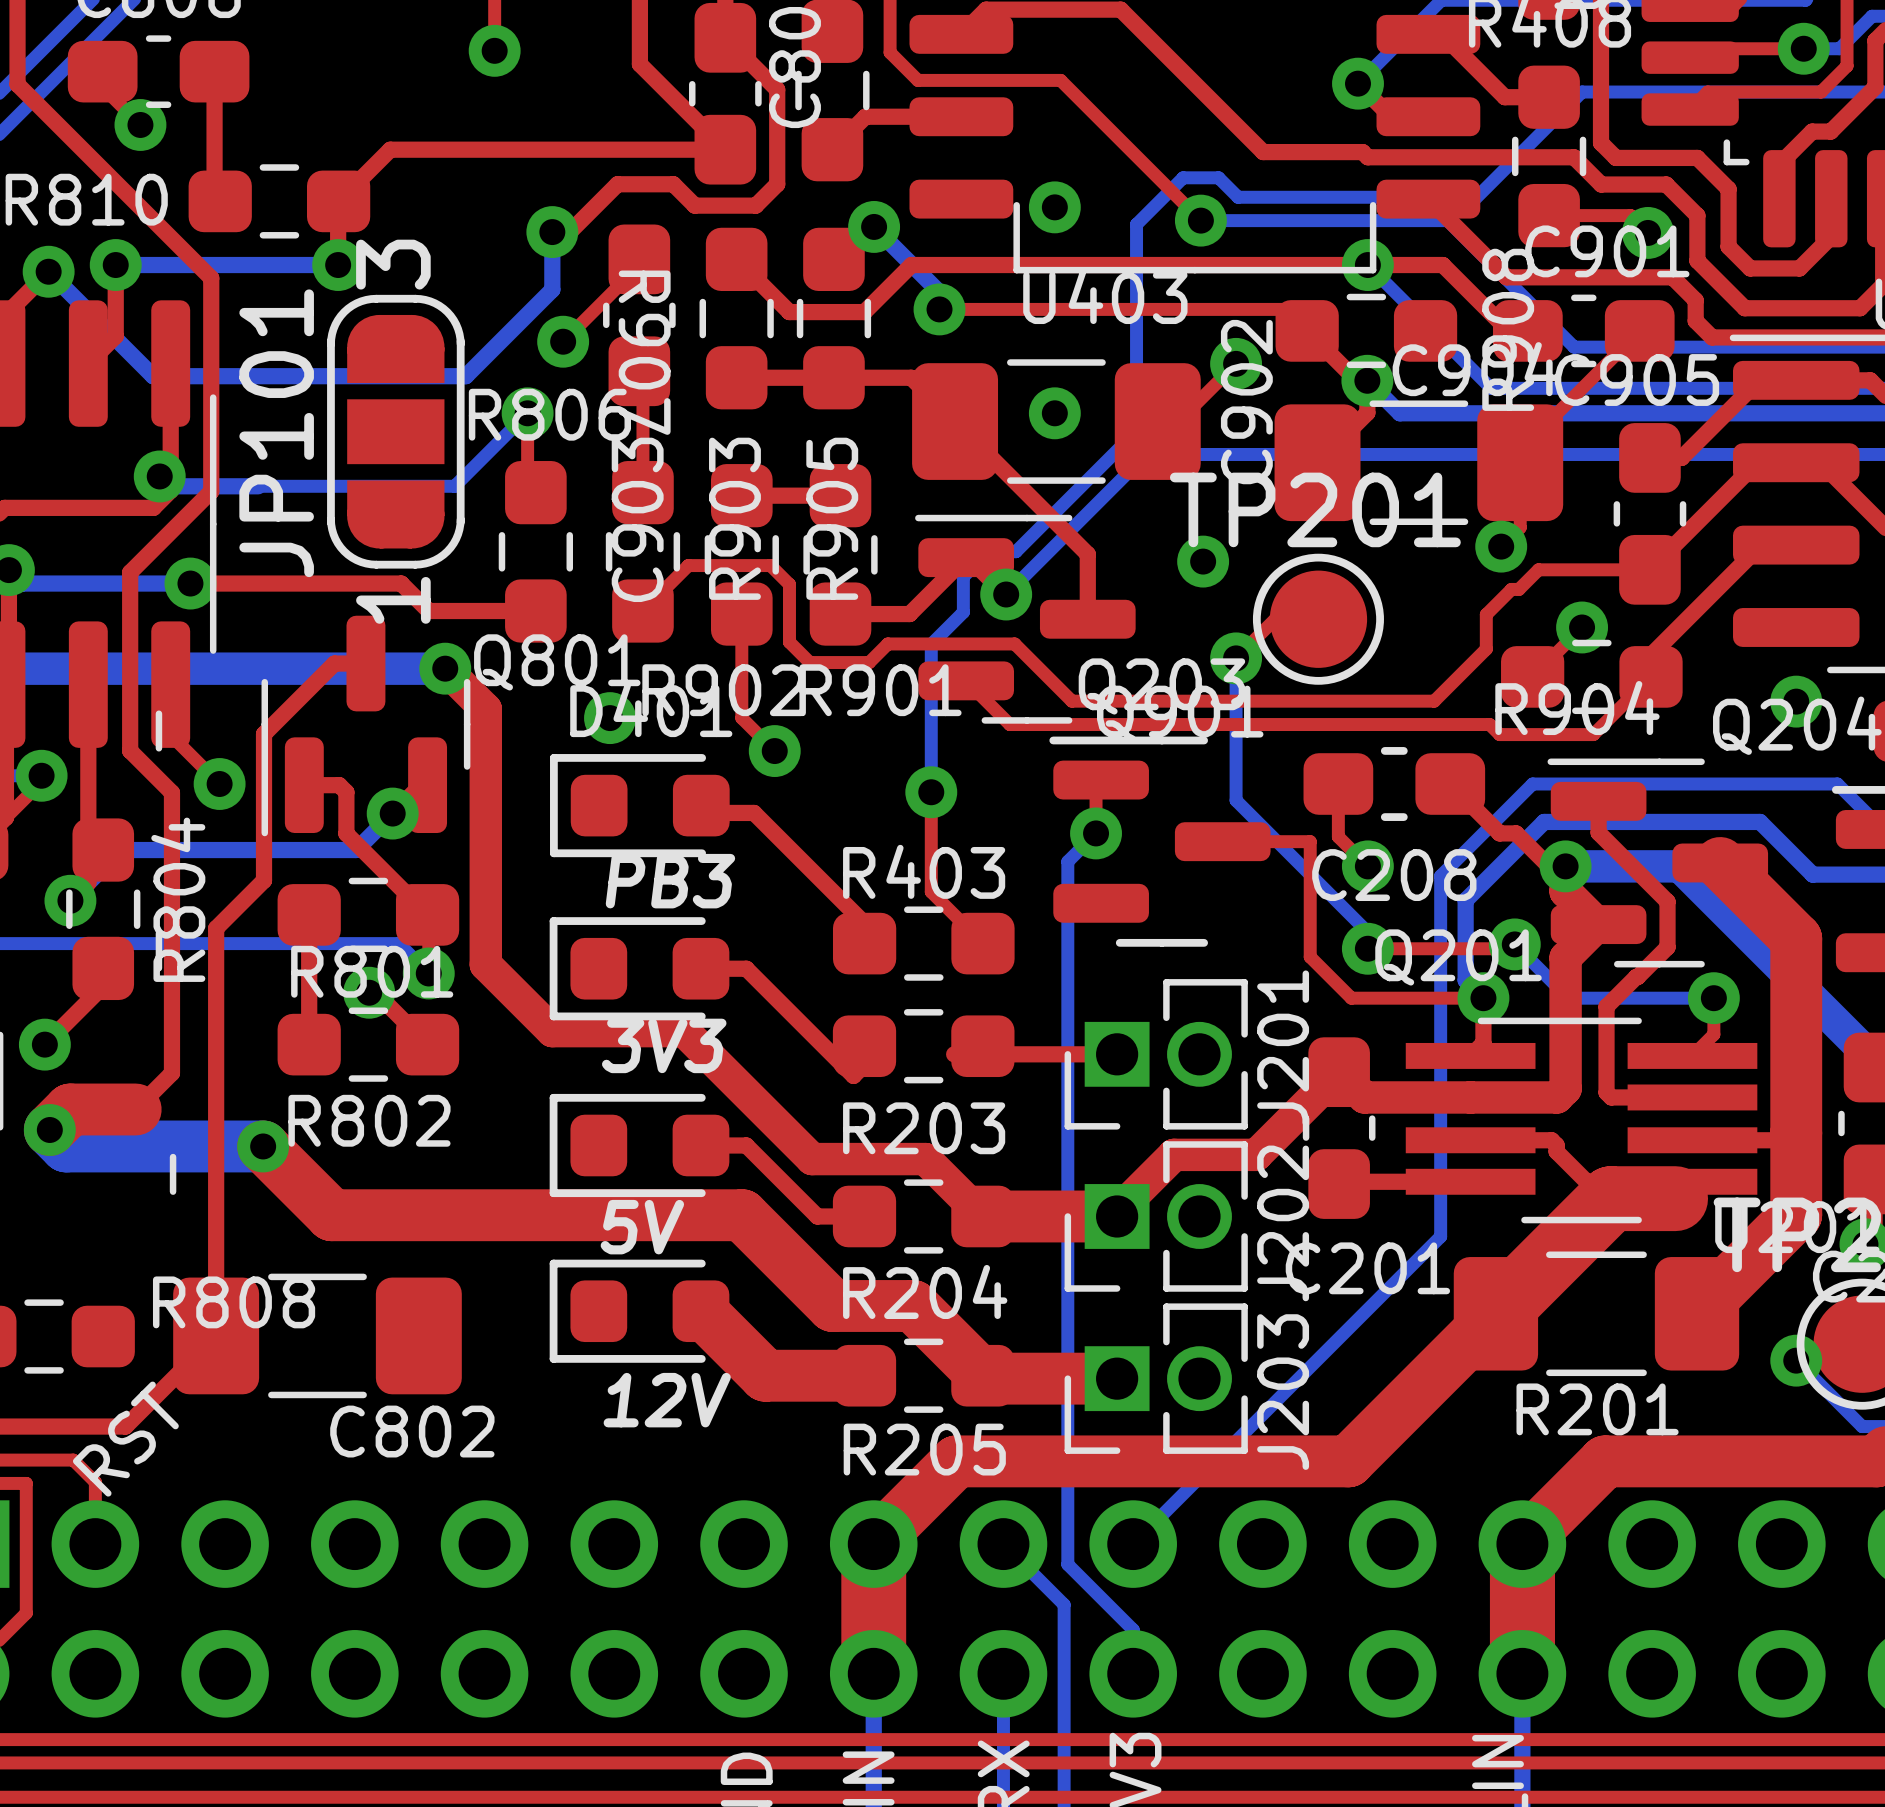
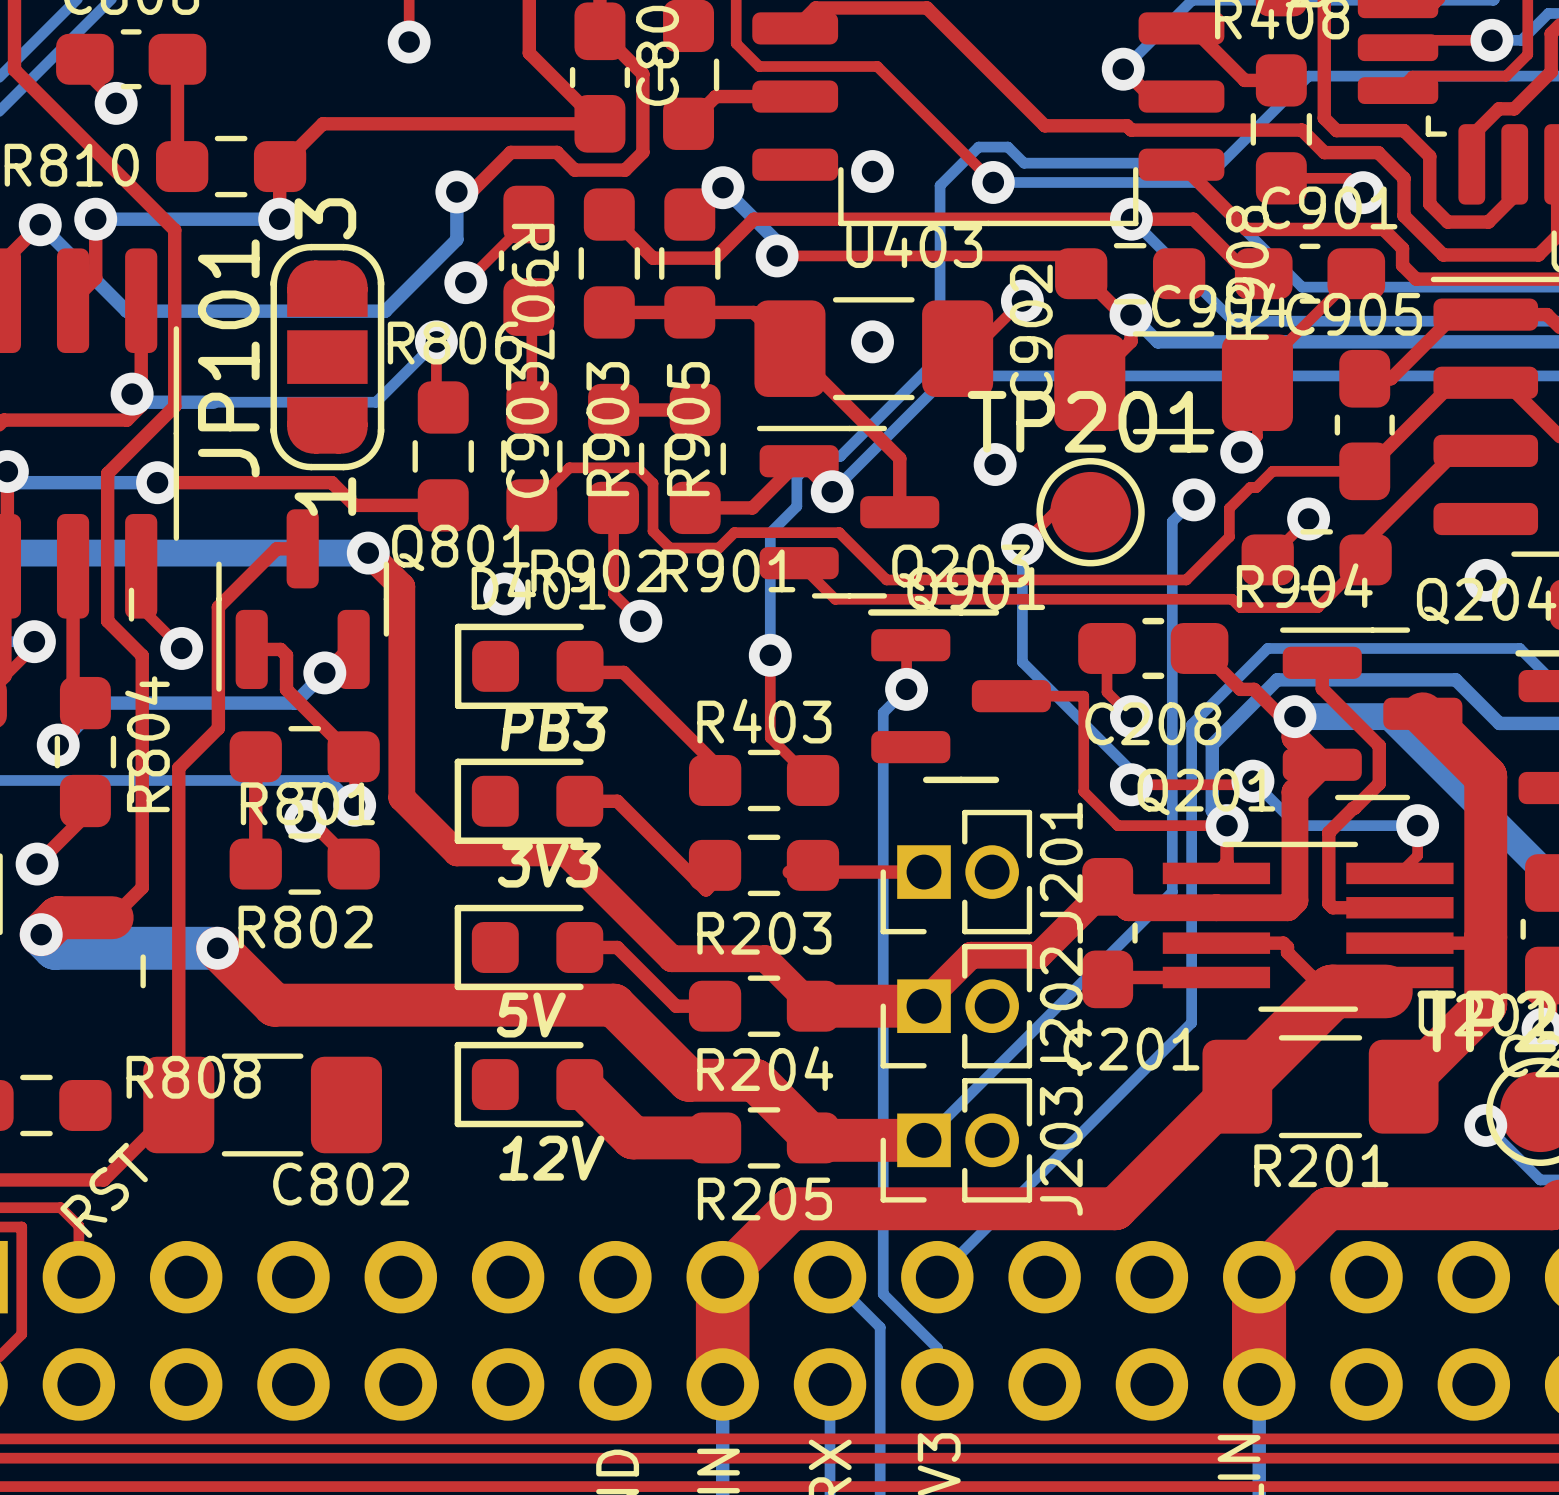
bottom track: none -> (1193, 499) (1172, 521) (1172, 892) (924, 1140)
via: none -> (1193, 499)

